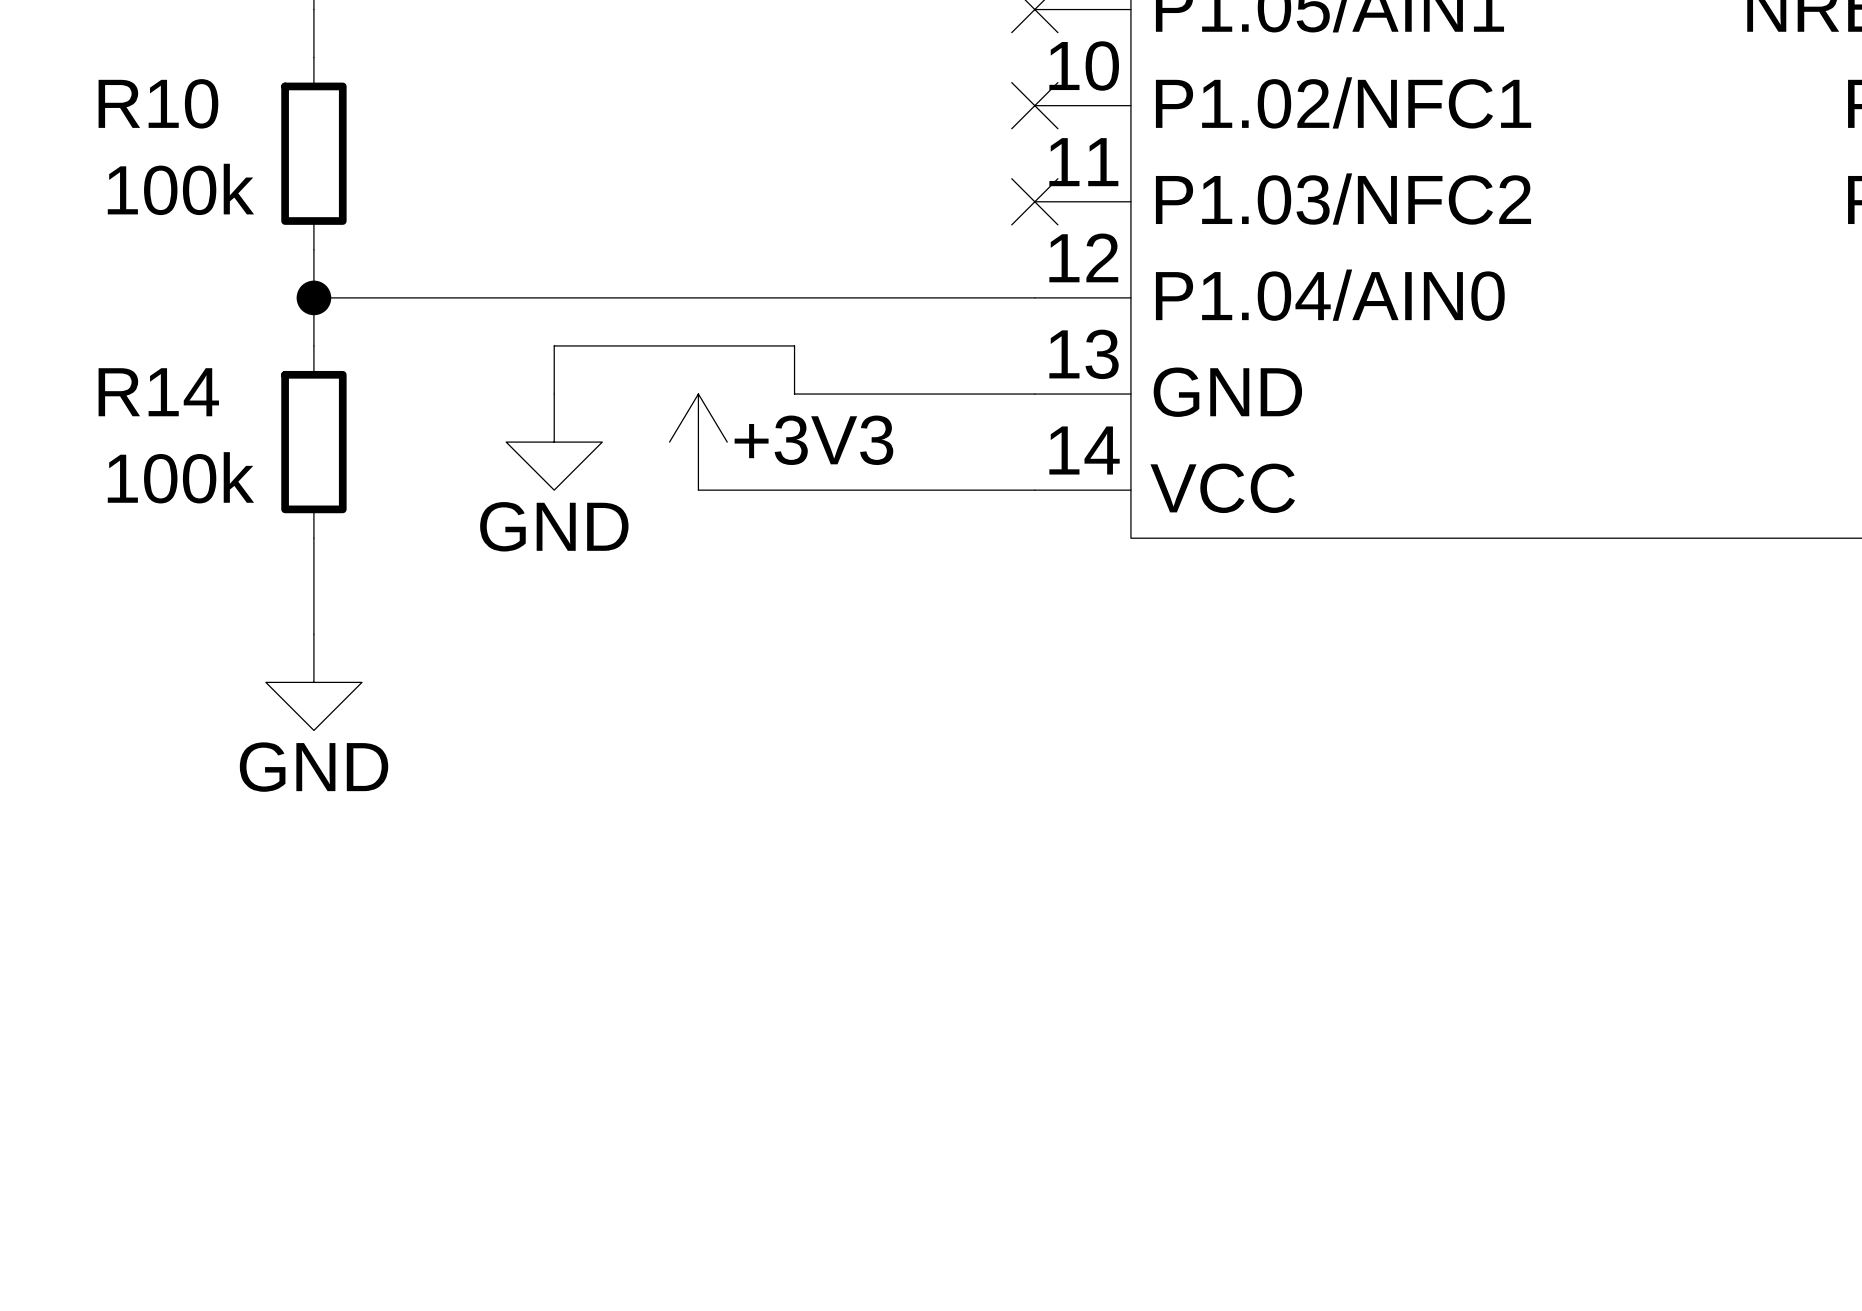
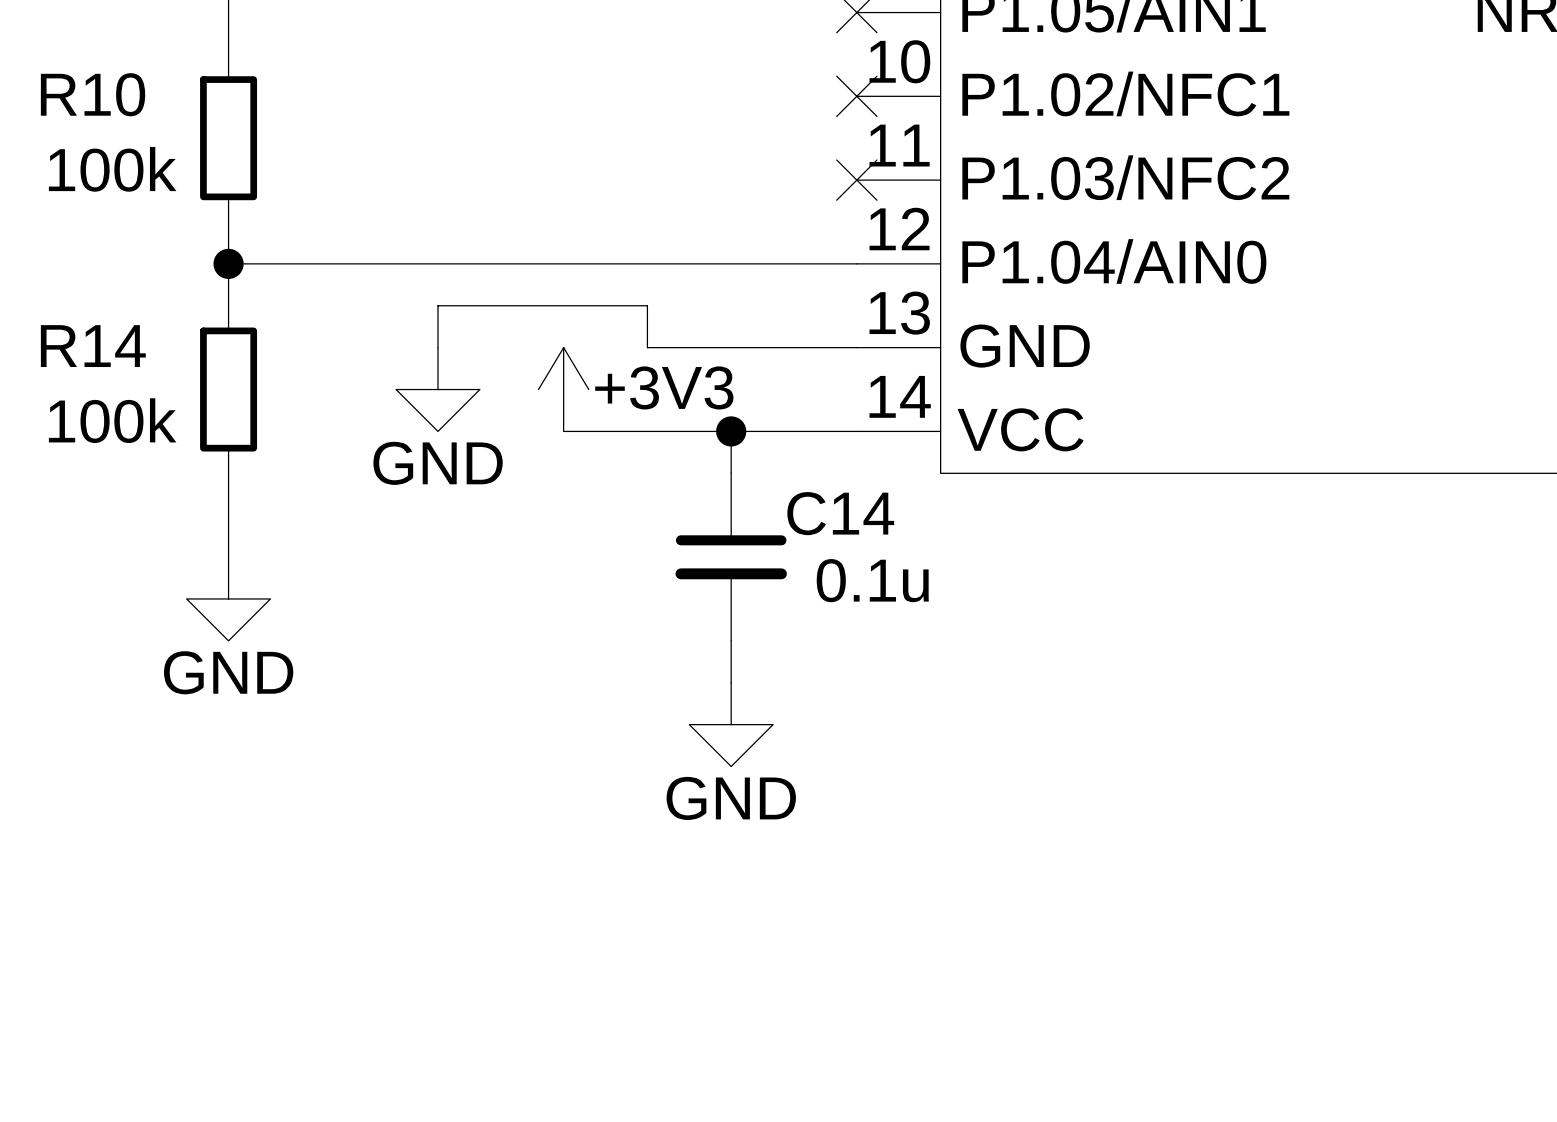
wire: none -> (731, 431) (731, 473)
junction: none -> (731, 431)
C14: none -> 0.1u (731, 557)
wire: none -> (731, 640) (731, 682)
power symbol: none -> GND (731, 724)

